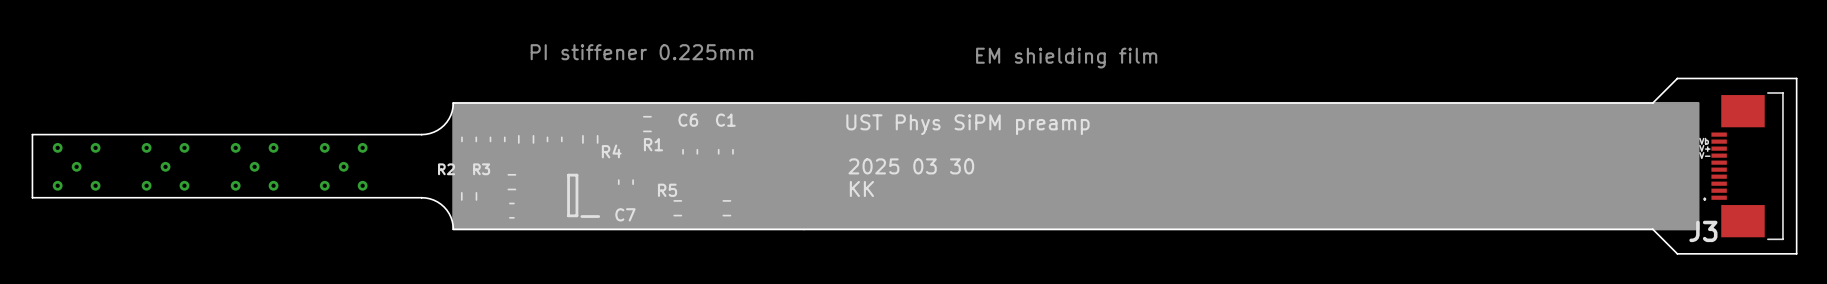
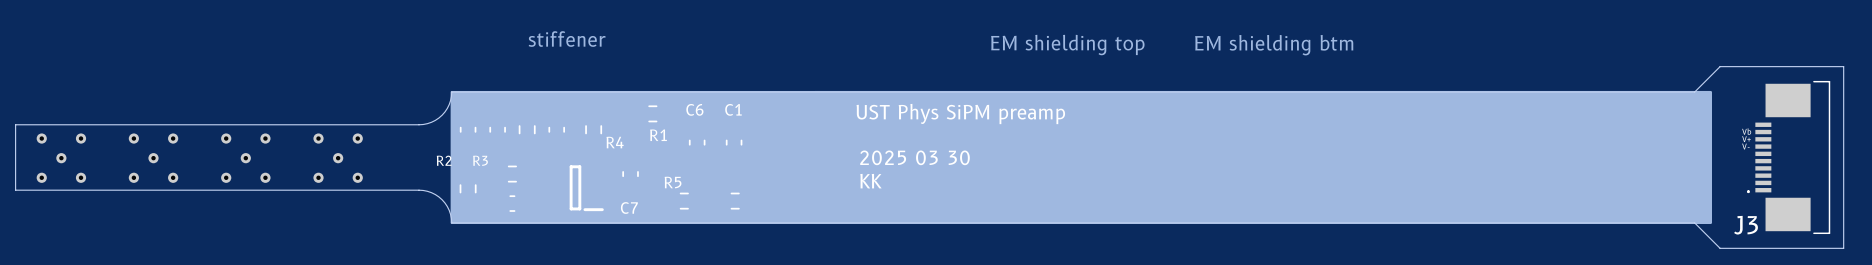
text: PI stiffener 0.225mm (641, 52) -> stiffener (567, 39)
text: EM shielding film (1066, 58) -> EM shielding top (1067, 45)
text: none -> EM shielding btm (1274, 45)
drawing: [803, 101, 1700, 231] -> none
drawing: none -> [814, 90, 1712, 224]

